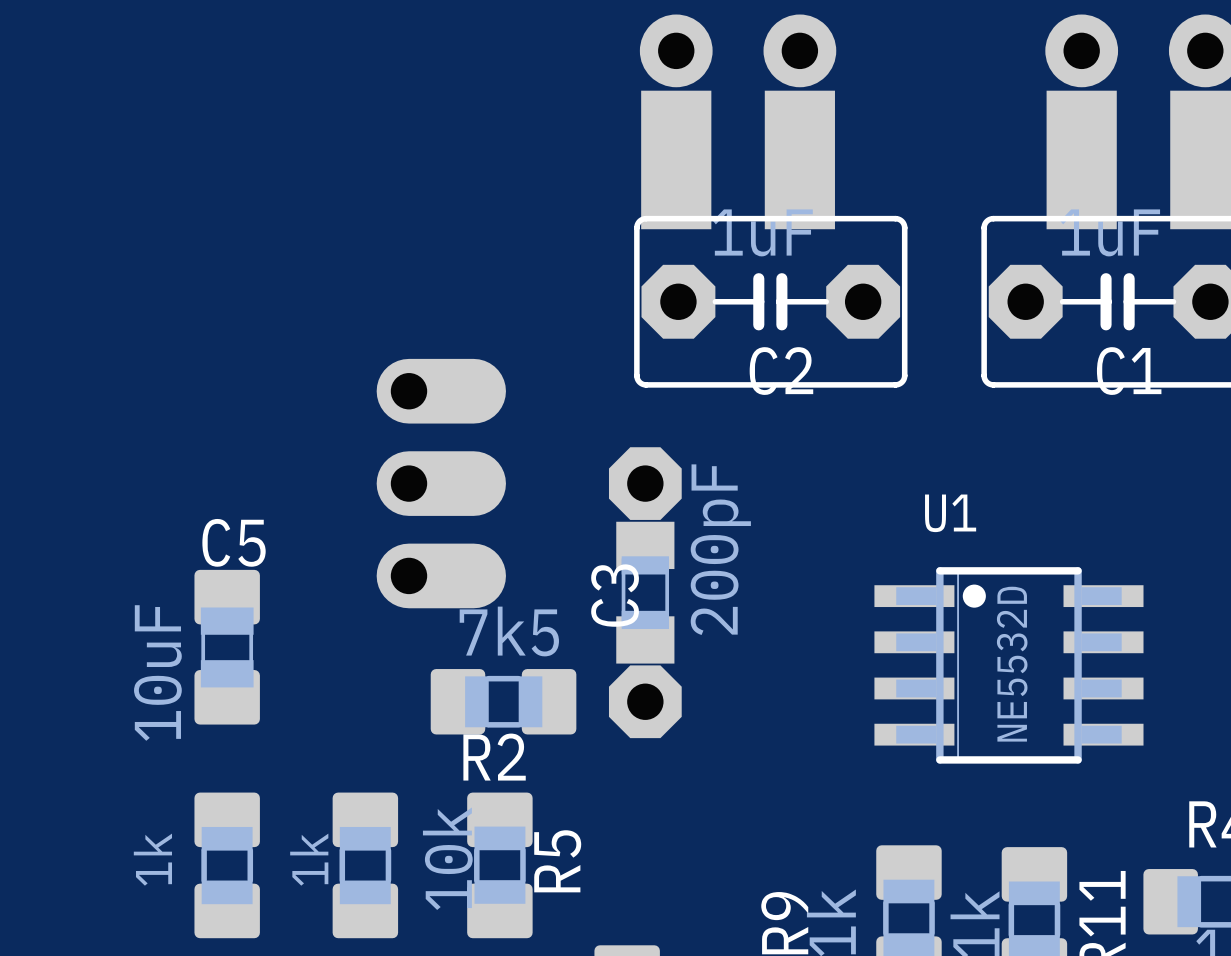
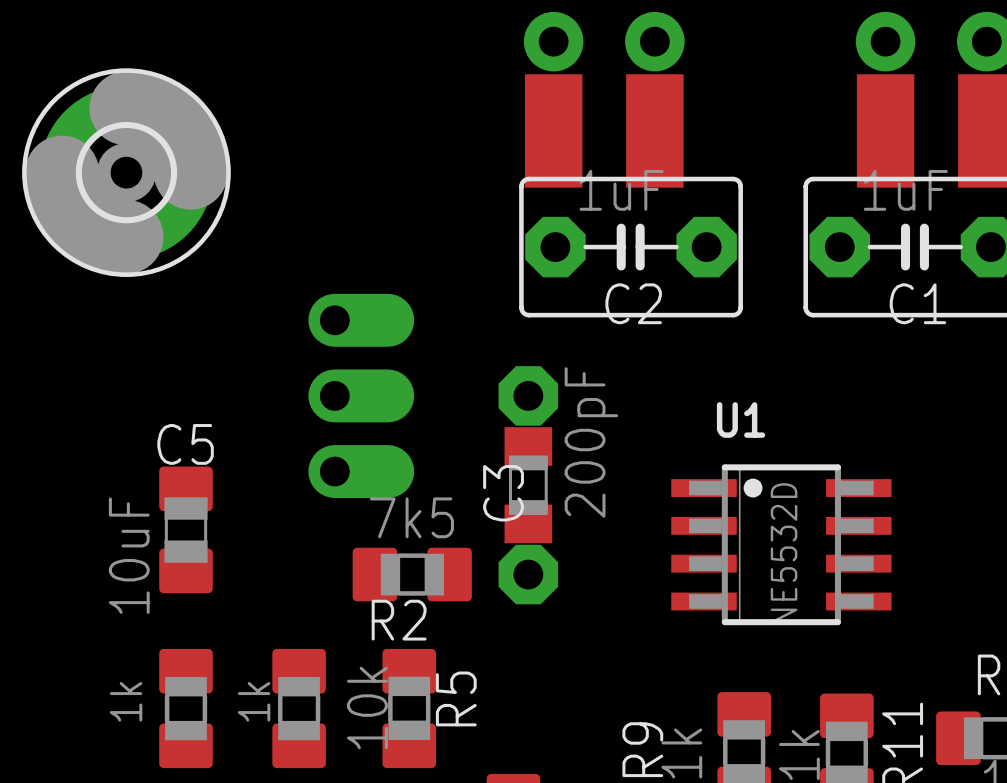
part: none -> (126, 172)
U1 position: (1008, 665) -> (781, 544)

